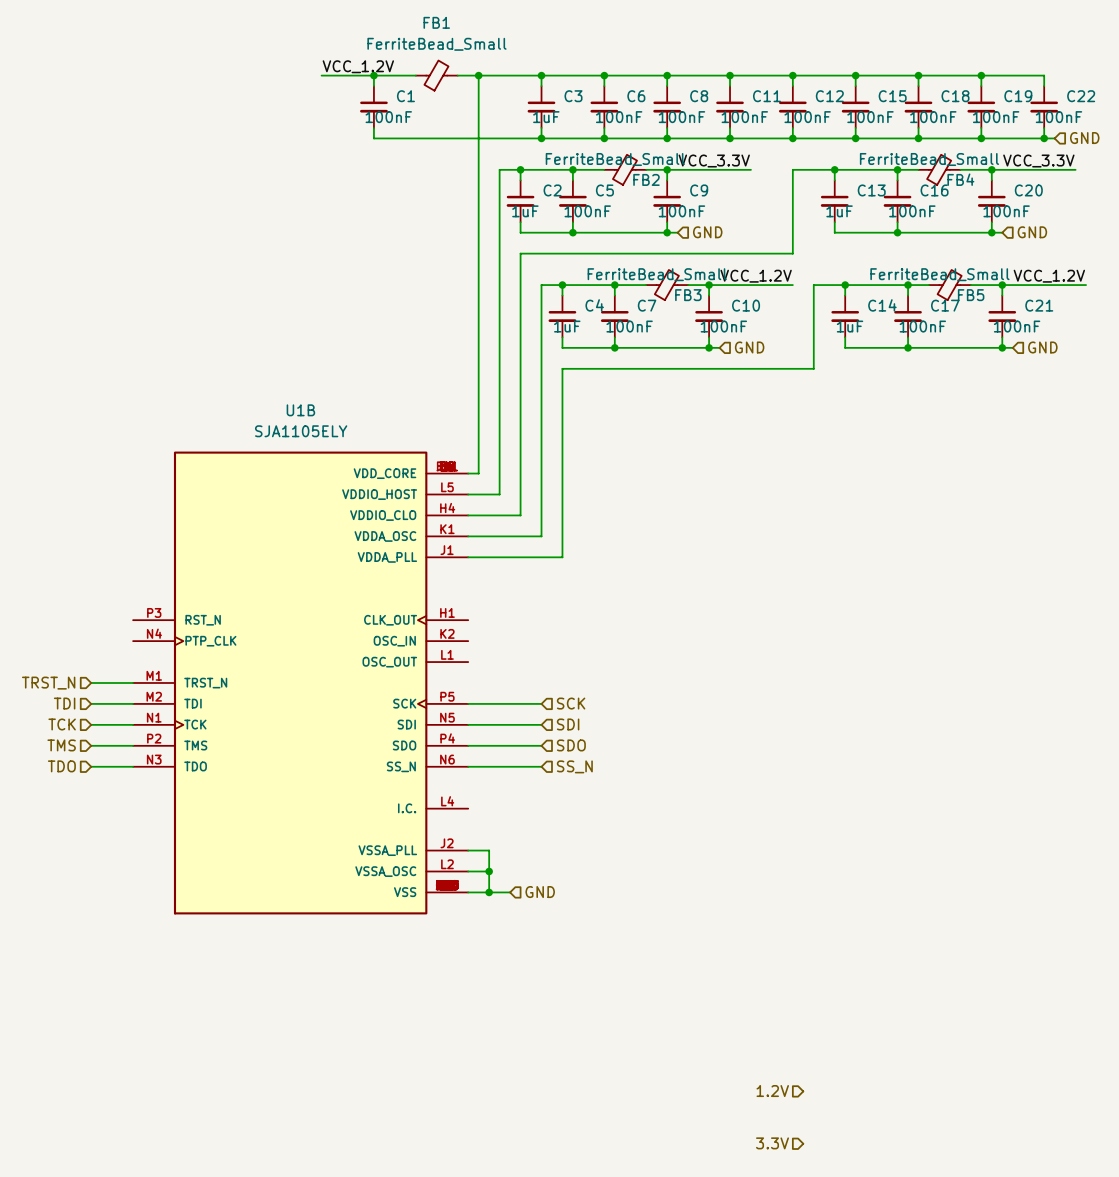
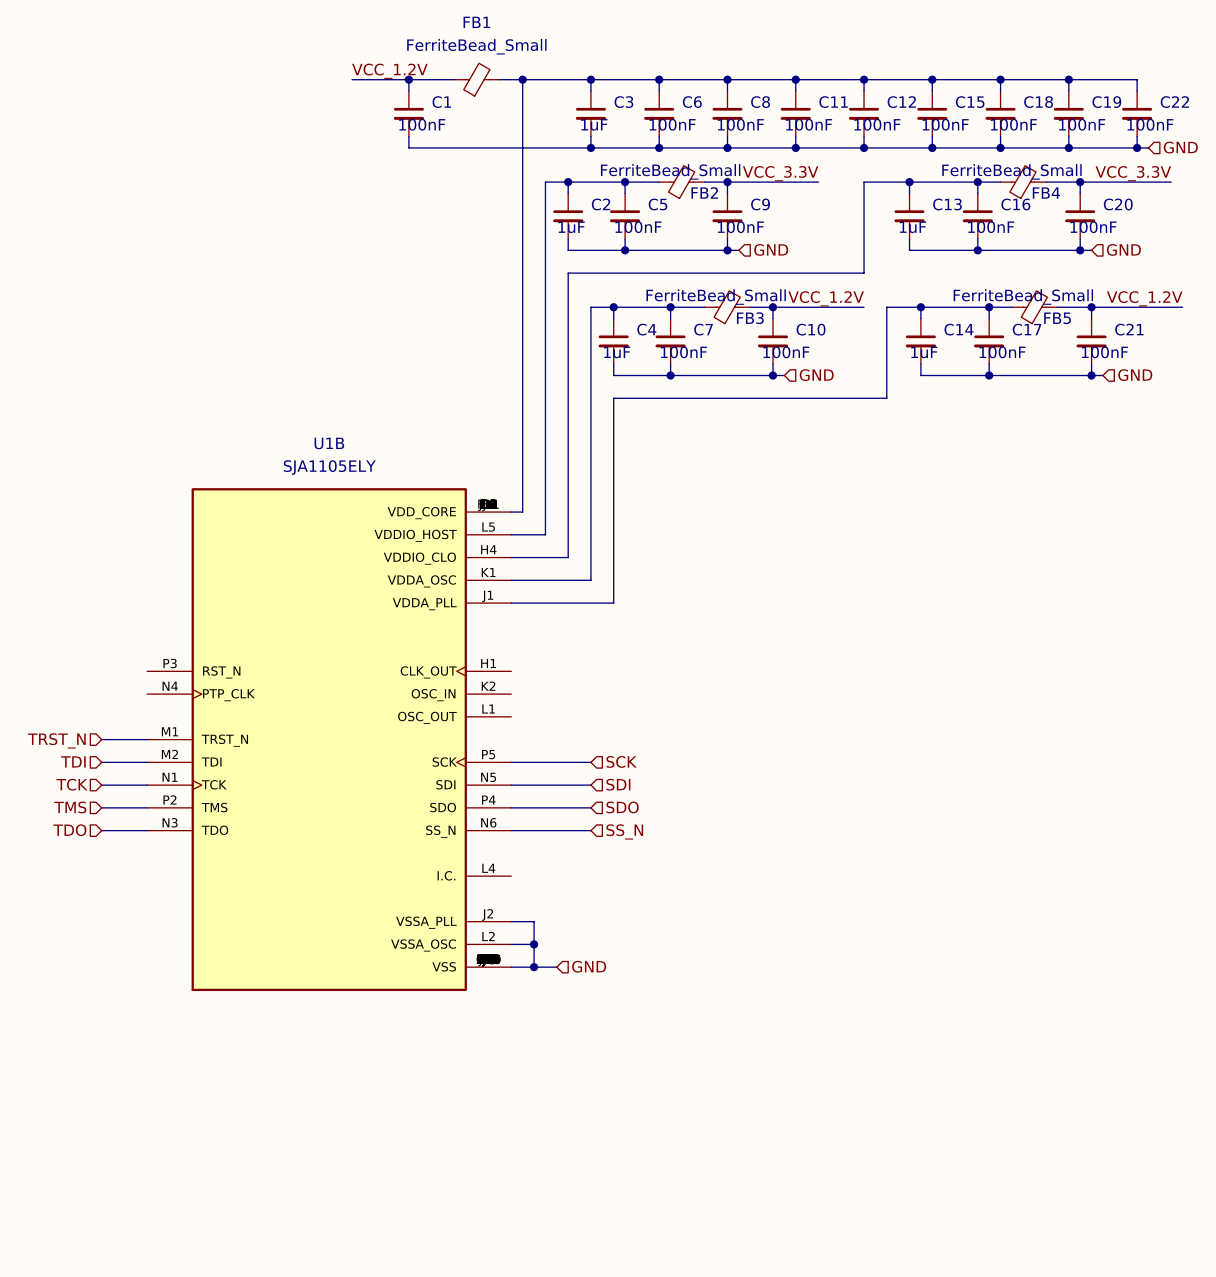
hierarchical label: 1.2V (772, 1091) -> none
hierarchical label: 3.3V (772, 1143) -> none

